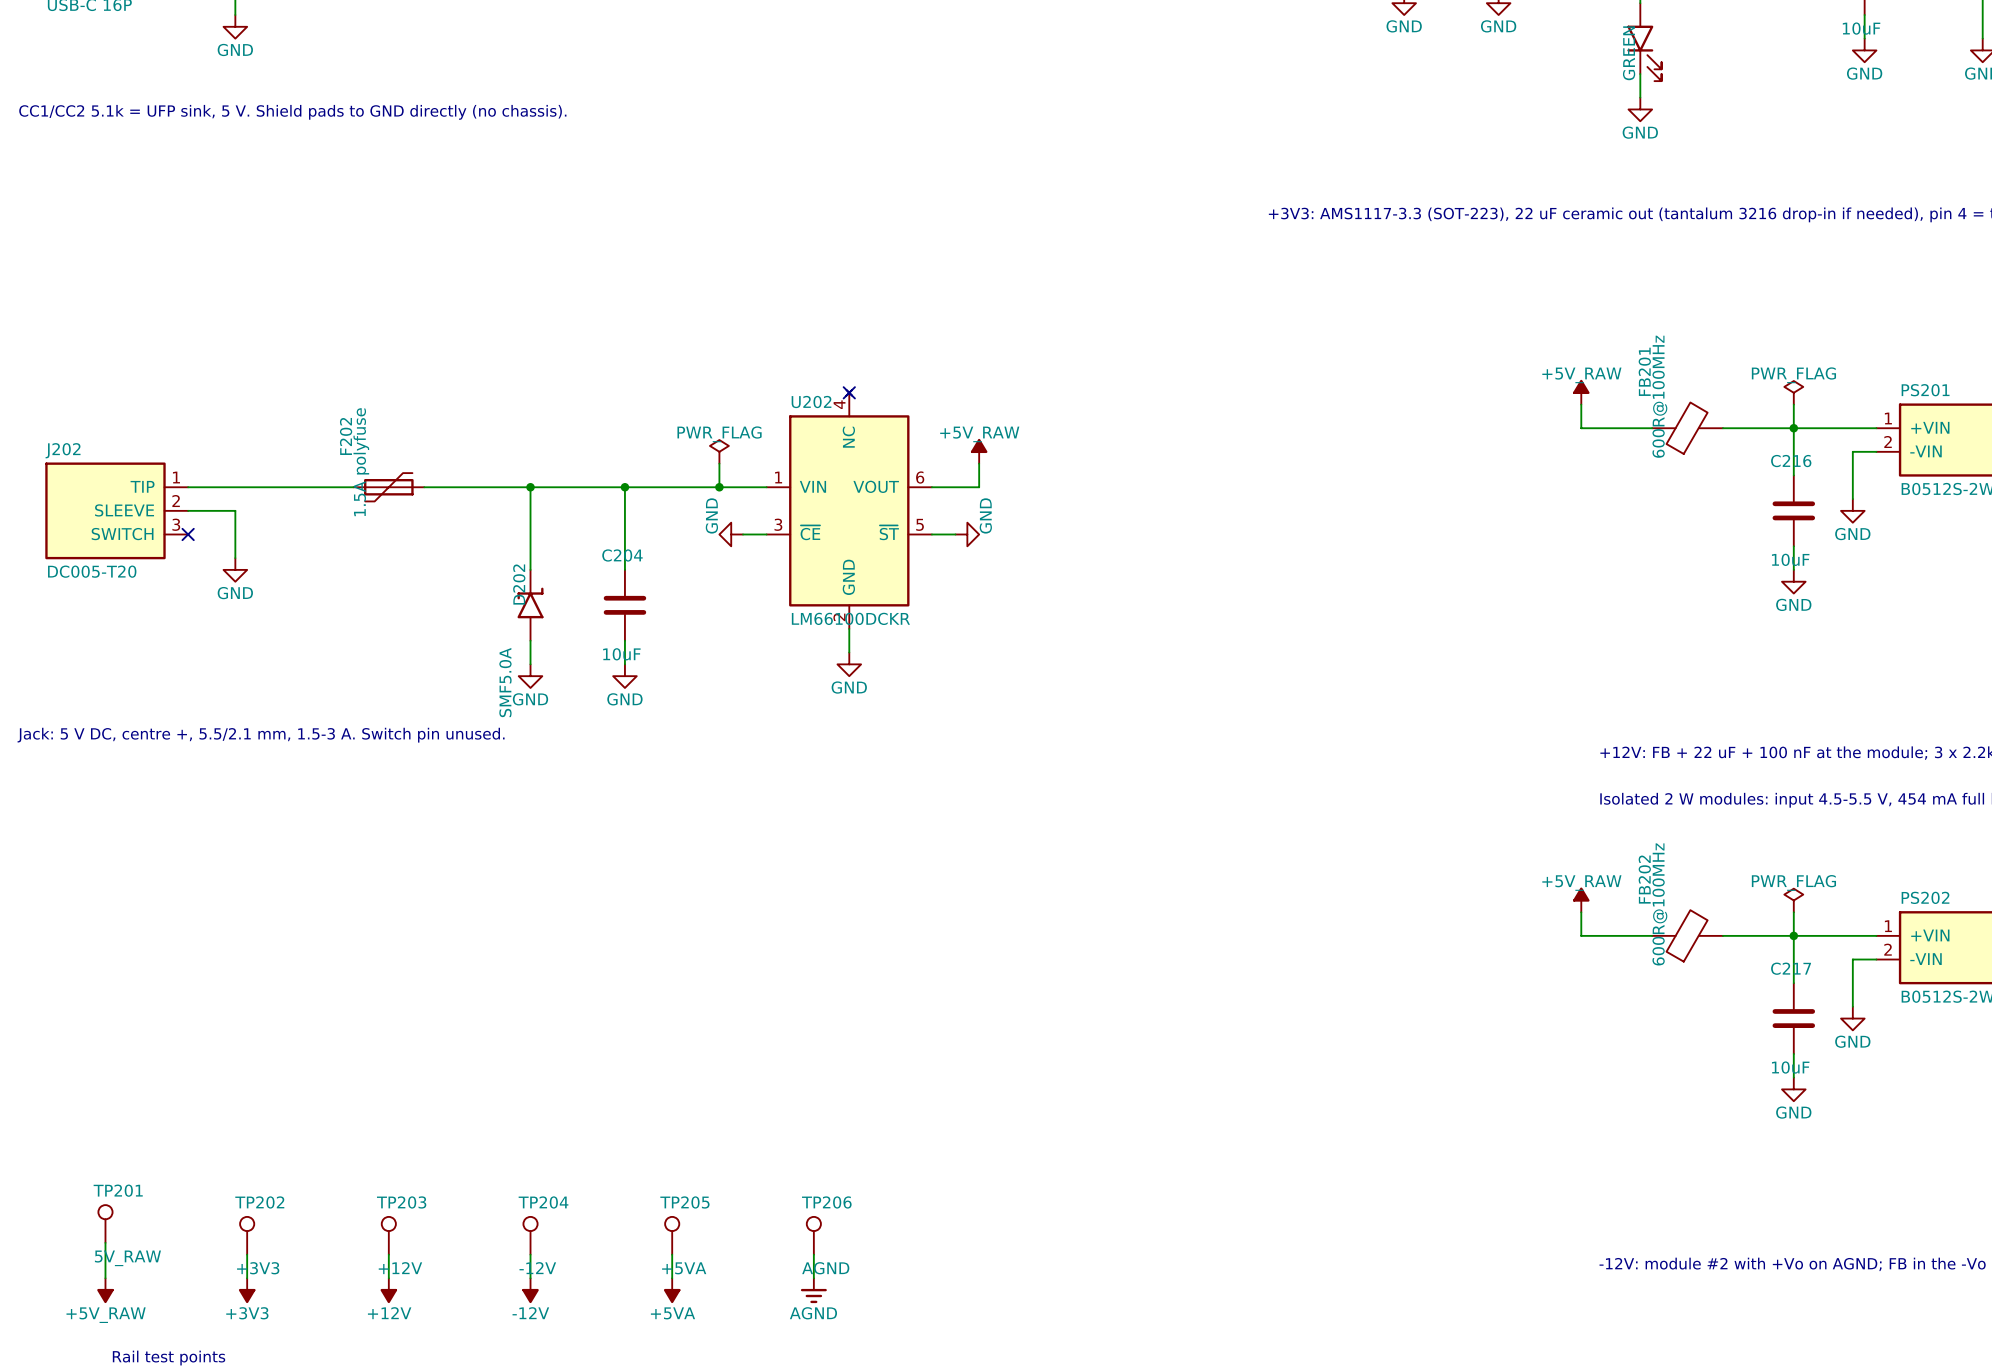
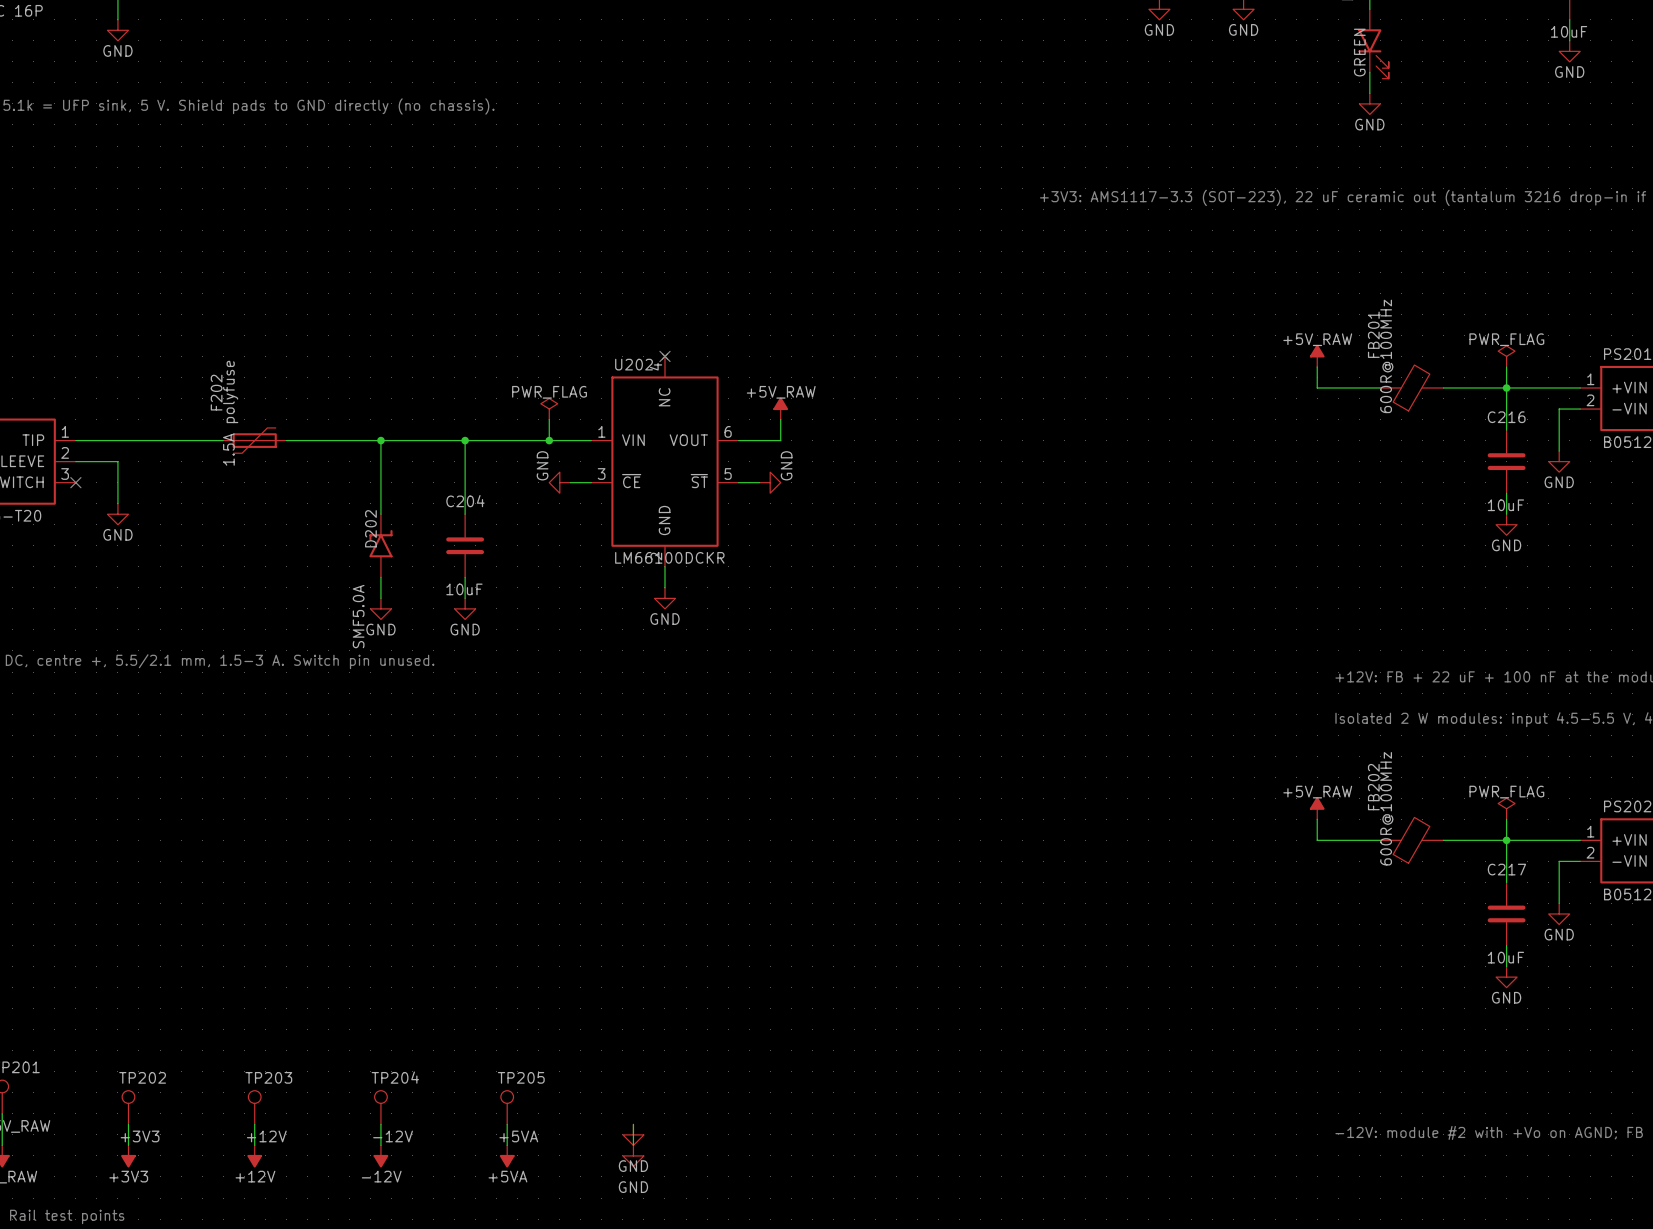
TP206: AGND (813, 1235) -> none
power symbol: none -> GND (633, 1134)
power symbol: AGND (813, 1290) -> GND (633, 1155)

